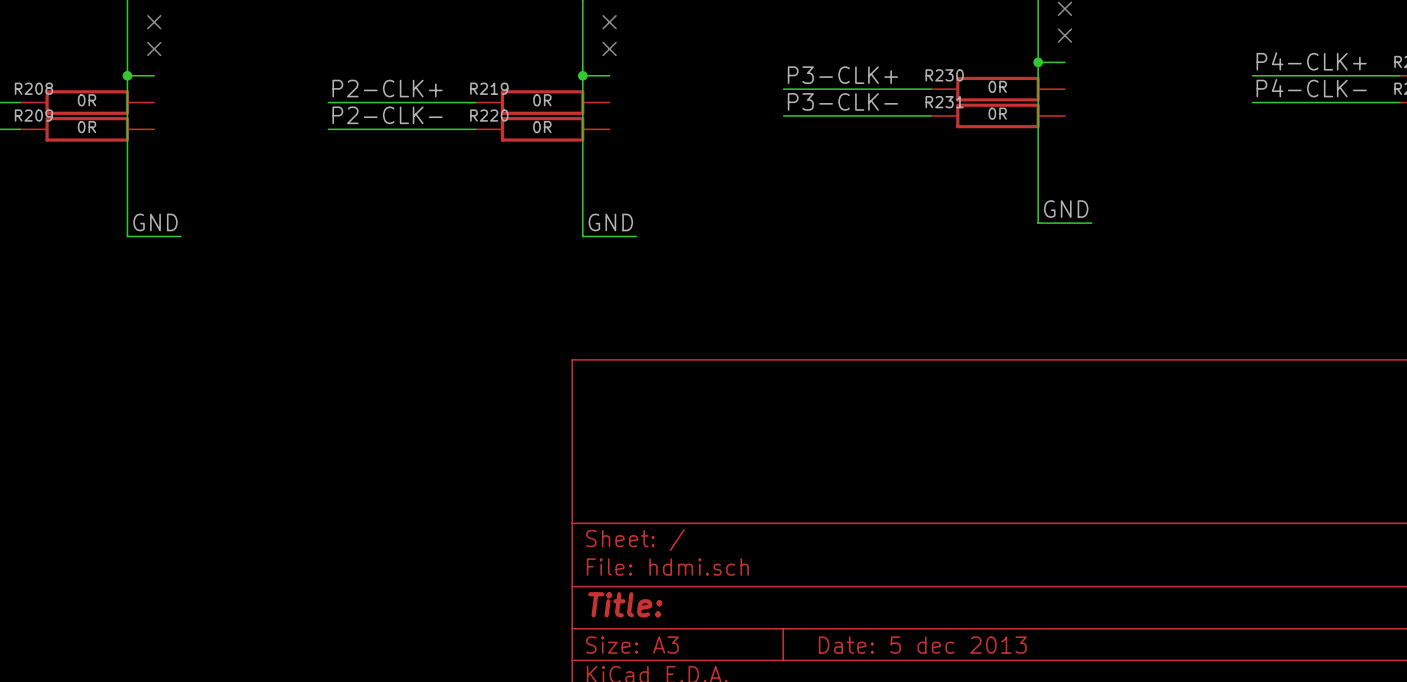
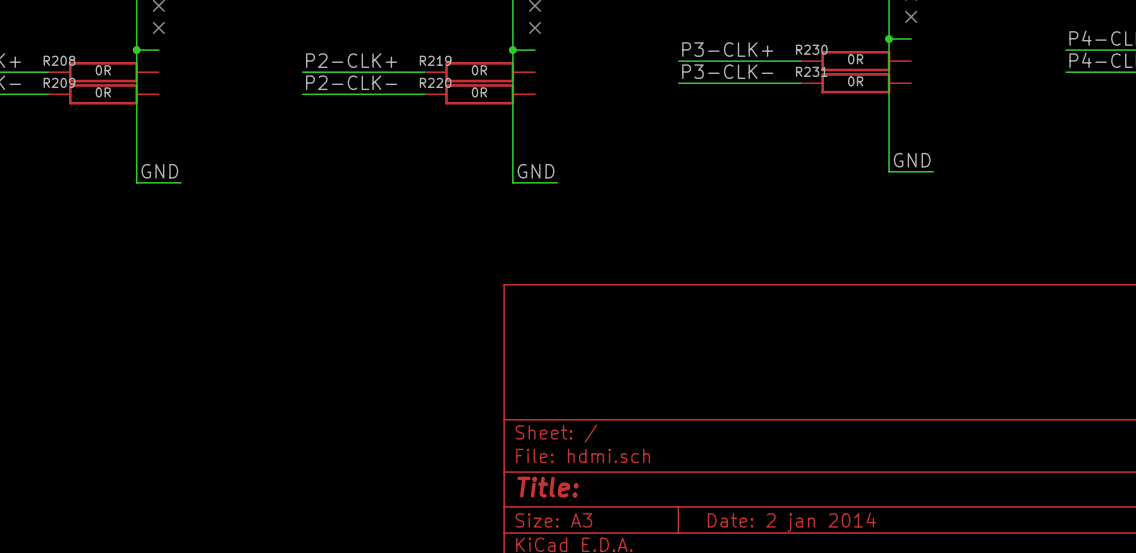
title block: Date: 5 dec 2013 (922, 645) -> Date: 2 jan 2014 (791, 522)

